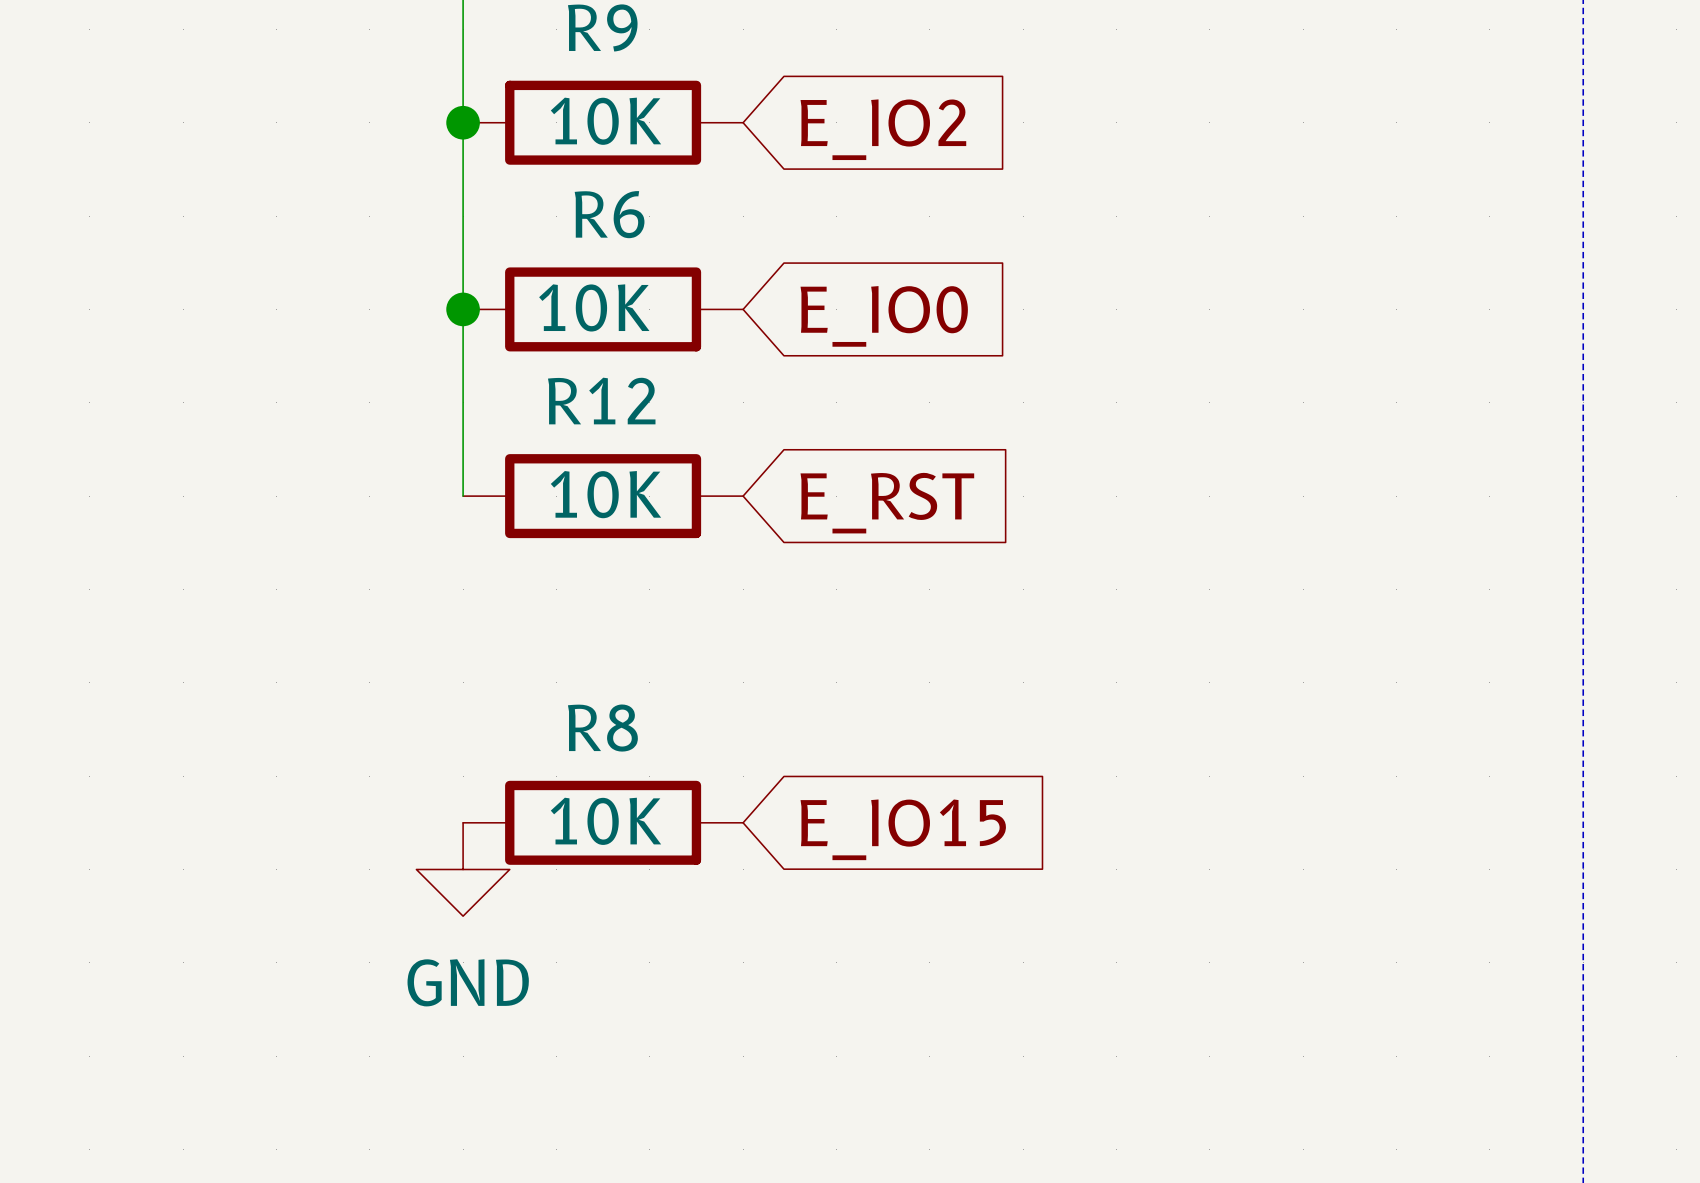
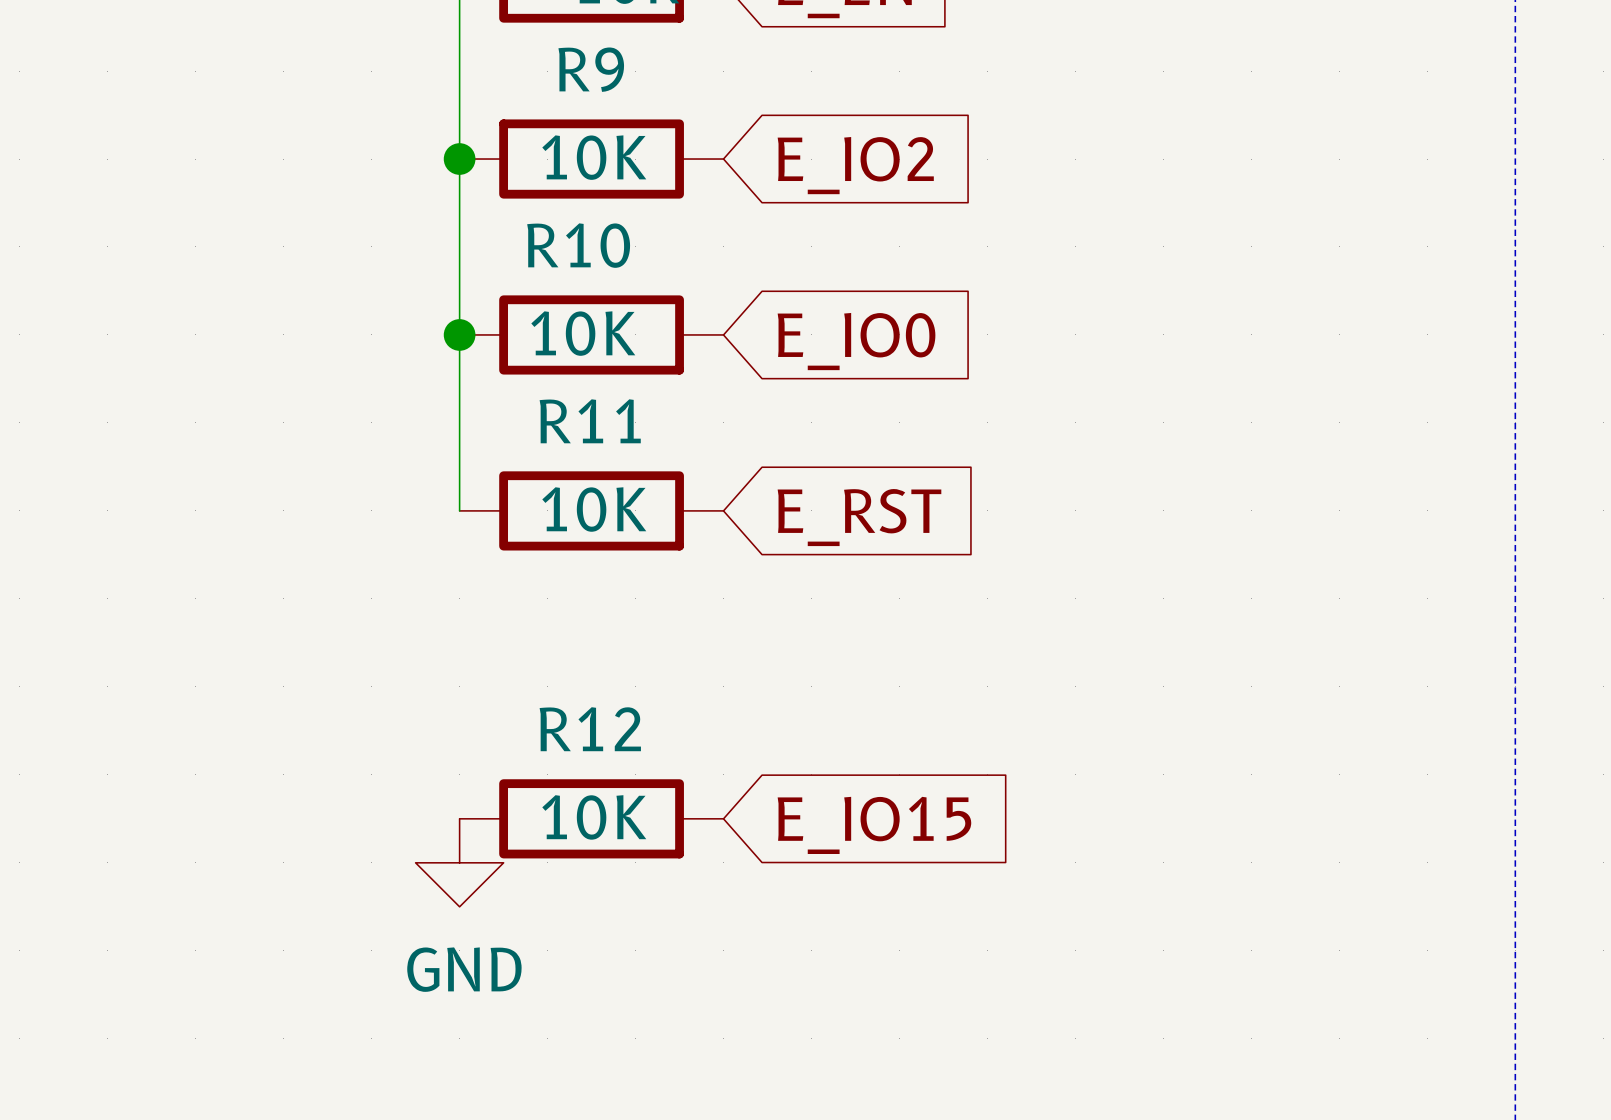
R6 name: R6 (609, 214) -> R10 (578, 245)
R12 name: R12 (601, 401) -> R11 (590, 421)
R8 name: R8 (602, 728) -> R12 (590, 729)

